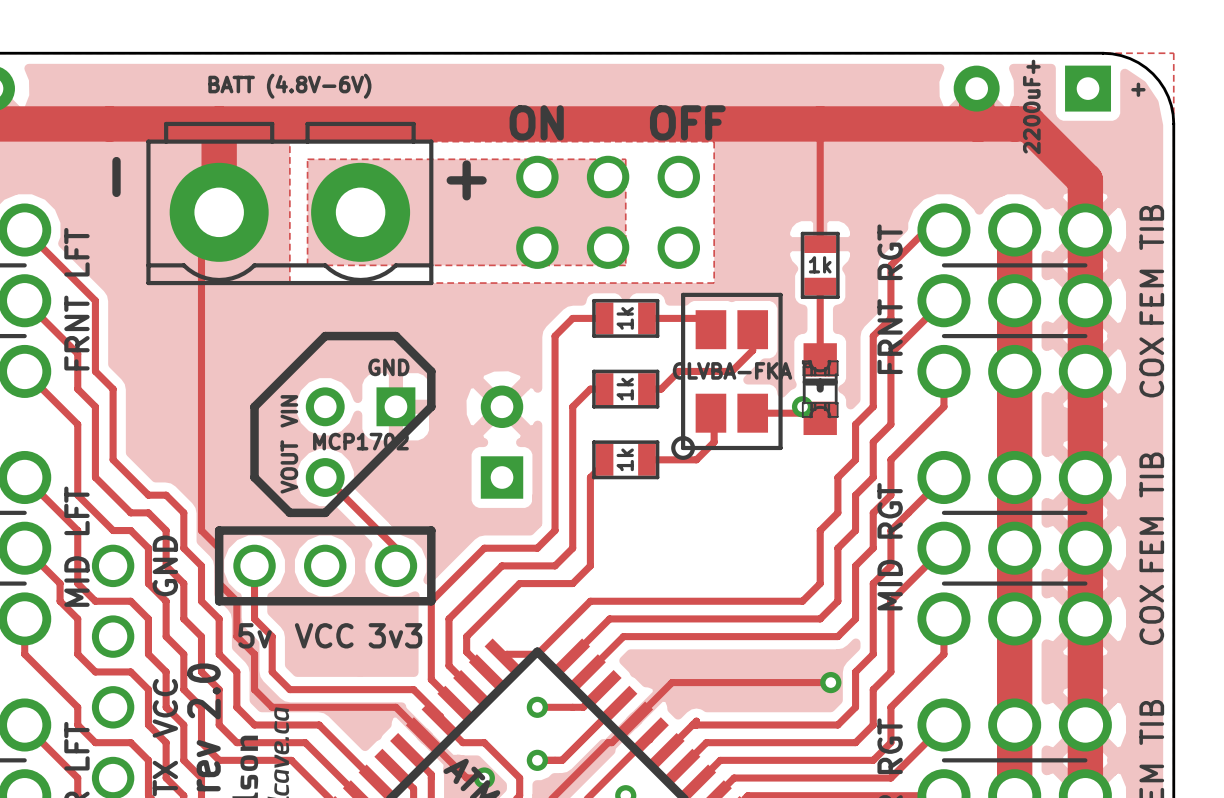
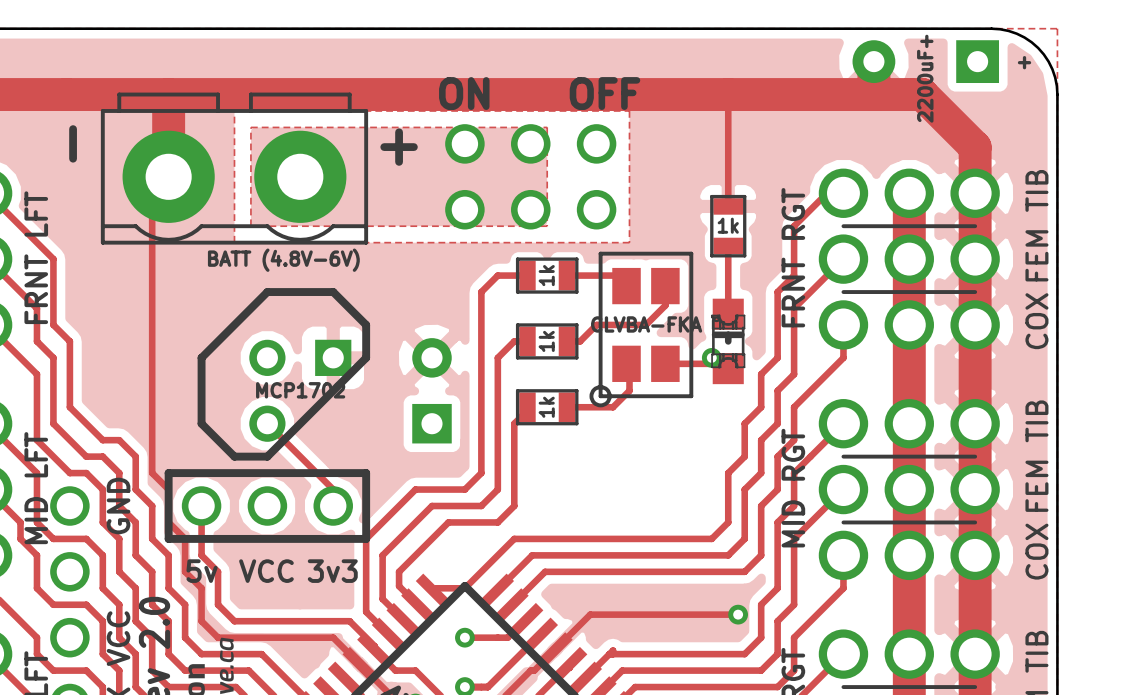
part value position: BATT (4.8V-6V) (289, 86) -> BATT (4.8V-6V) (283, 260)
text: GND (388, 367) -> none
text: VIN (289, 411) -> none
text: VOUT (289, 466) -> none

